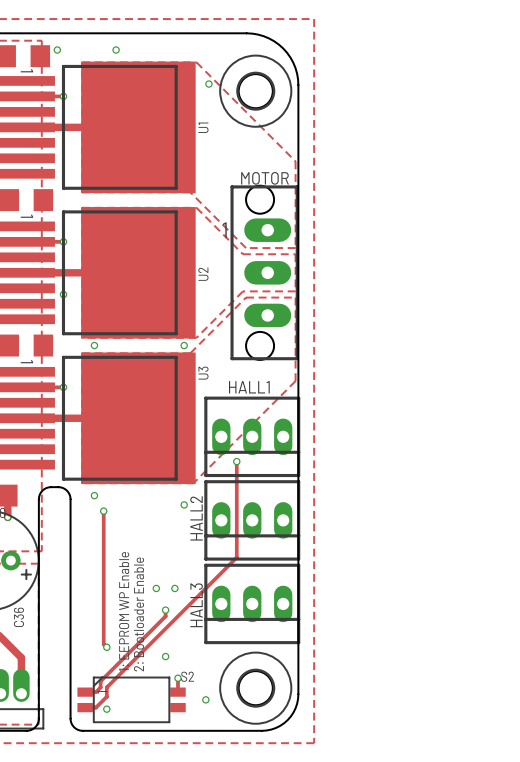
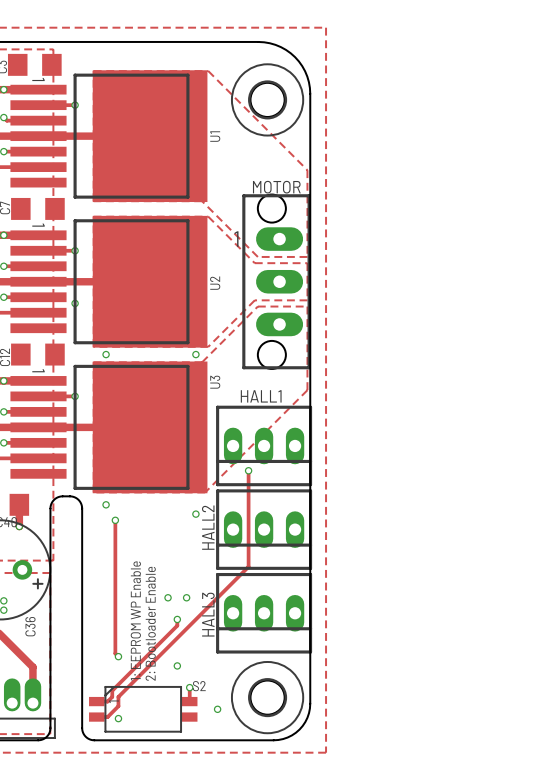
via: (57, 50) -> none
via: (116, 50) -> none
via: (208, 84) -> none

